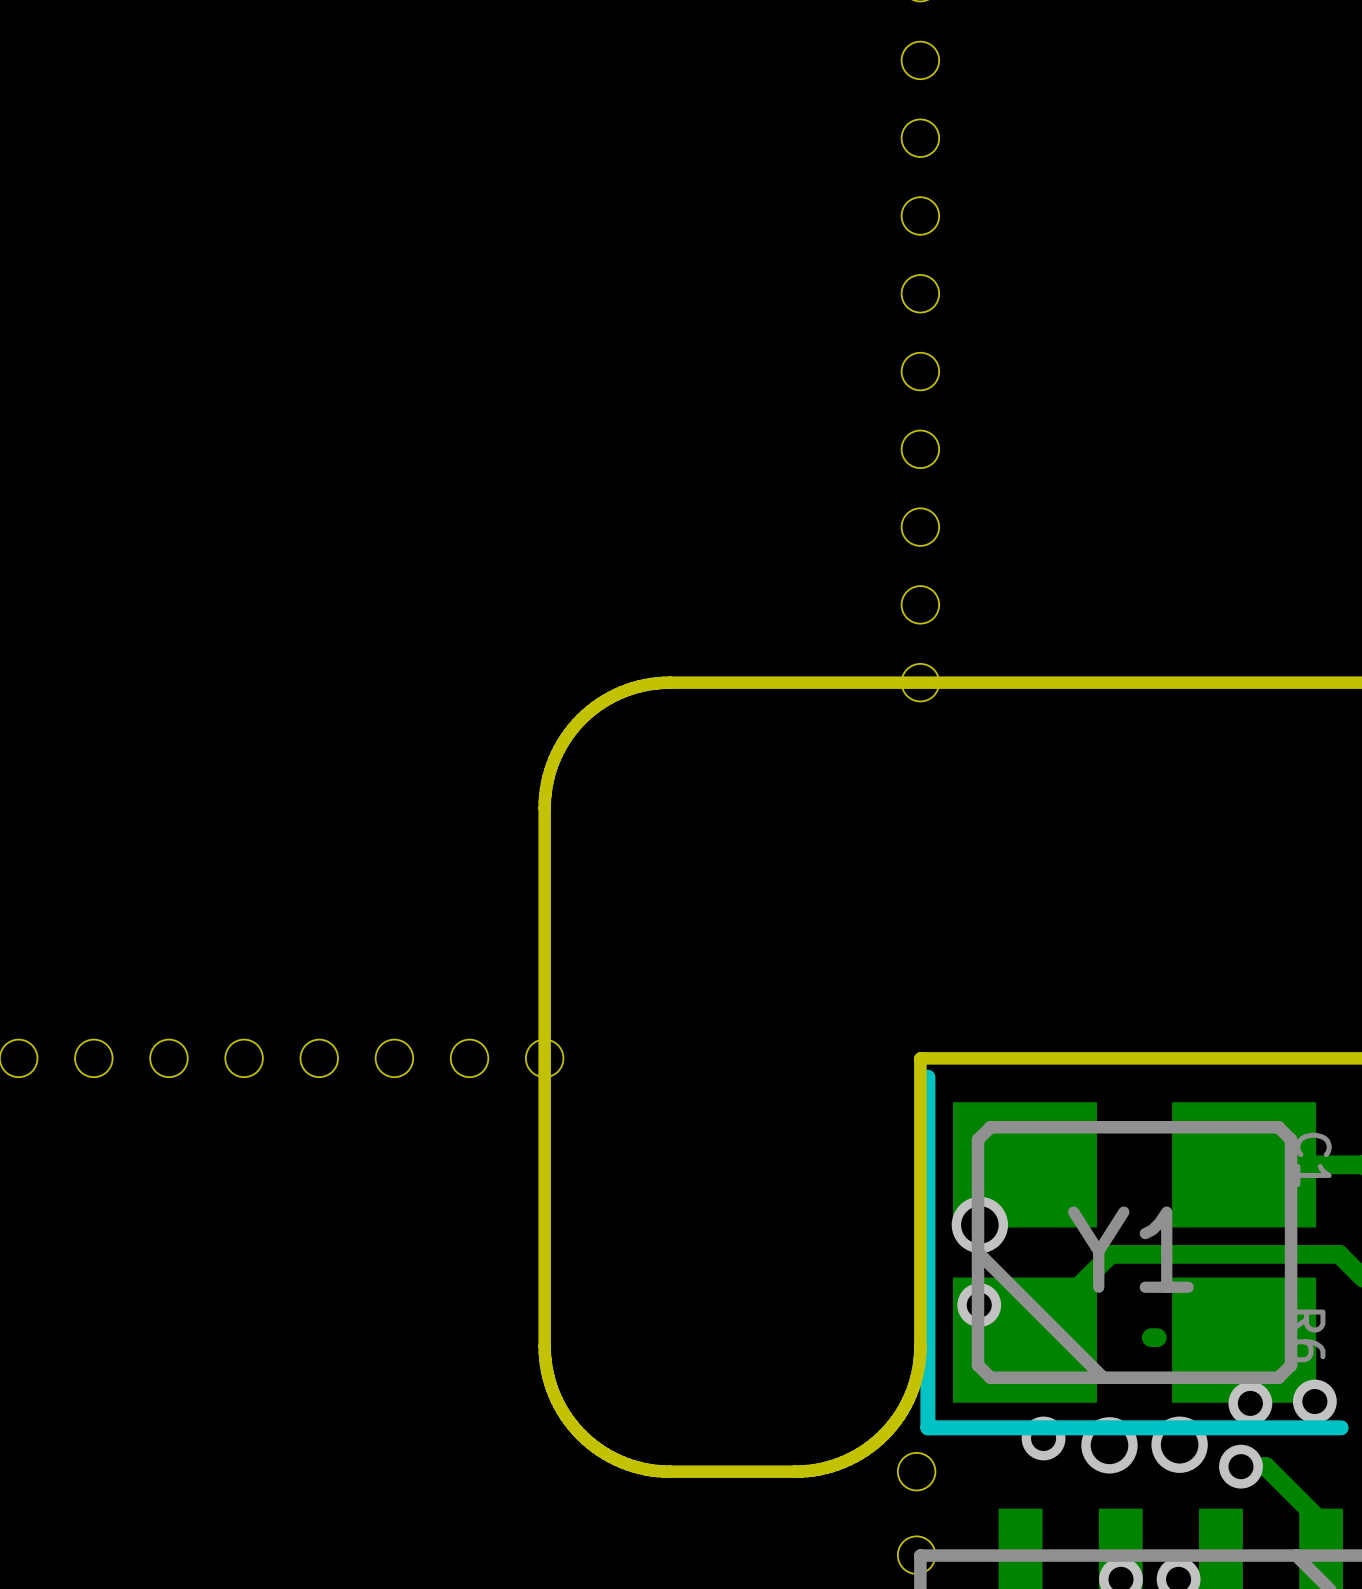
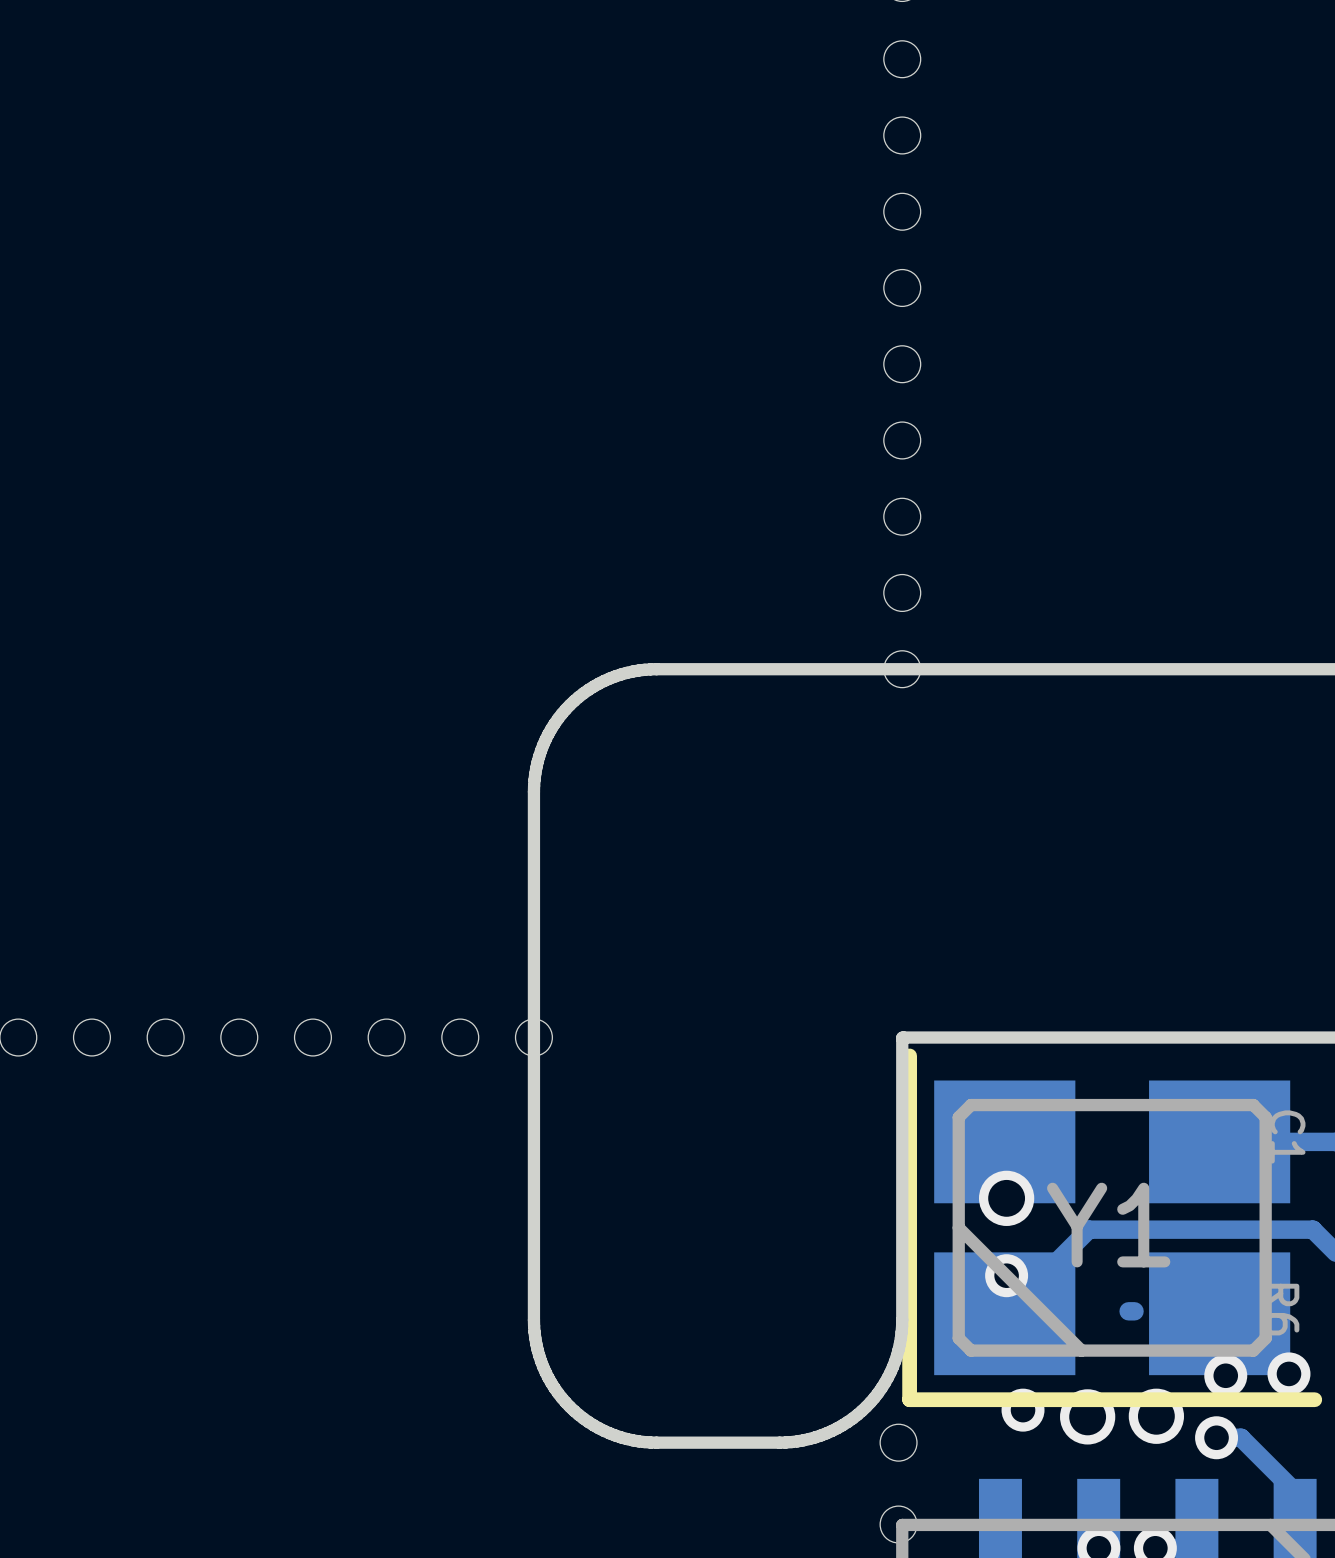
via position: (979, 1224) -> (1006, 1198)
via position: (979, 1305) -> (1006, 1275)

